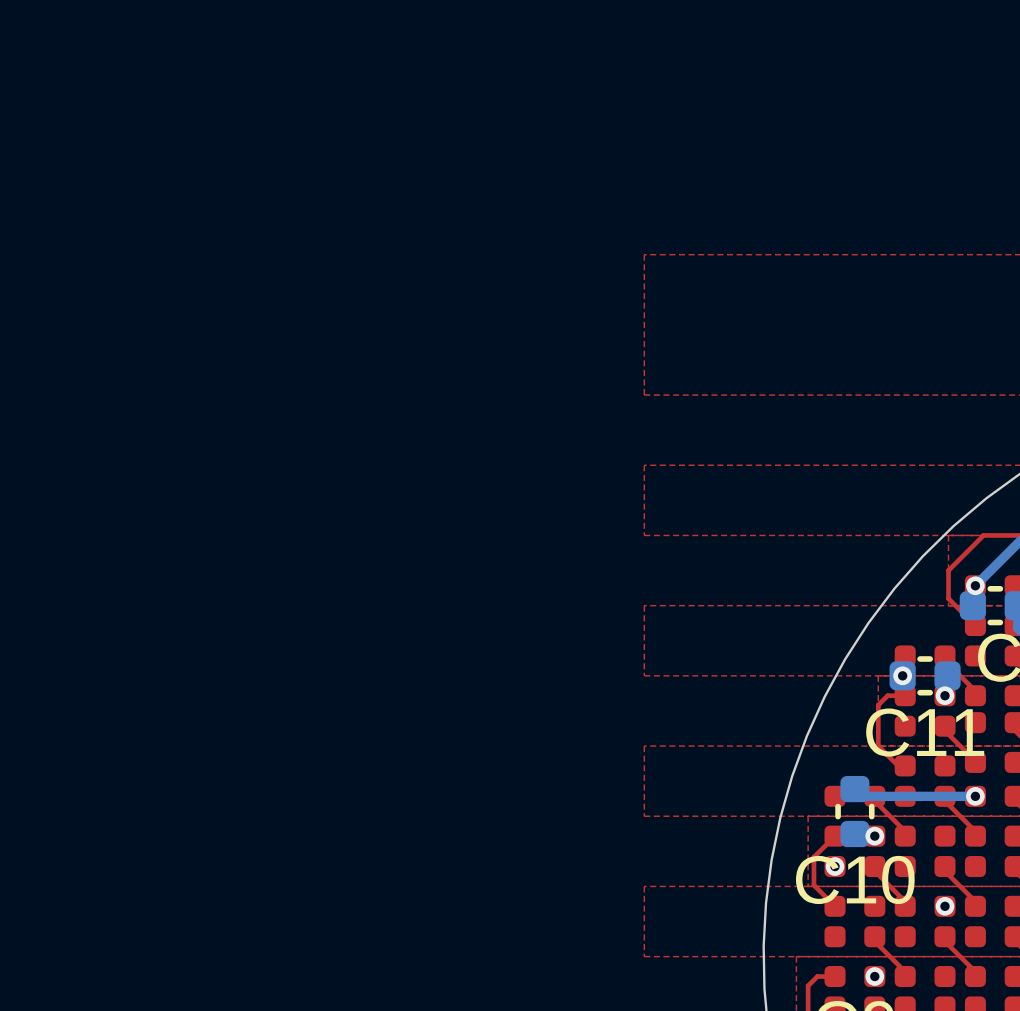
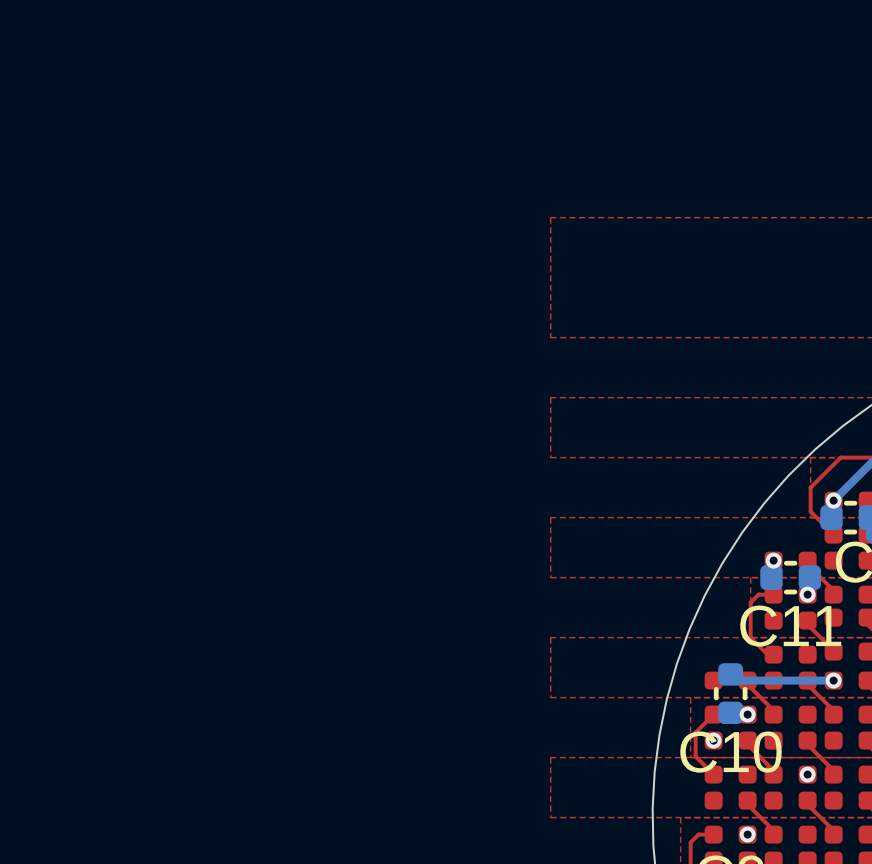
via: none -> (773, 560)
via: (902, 675) -> none

